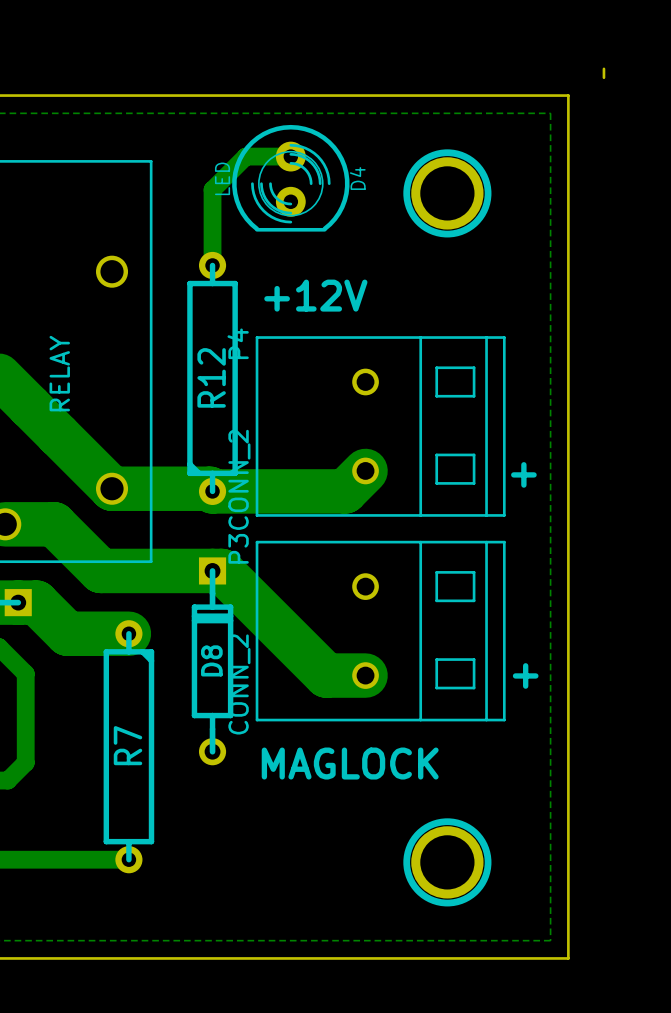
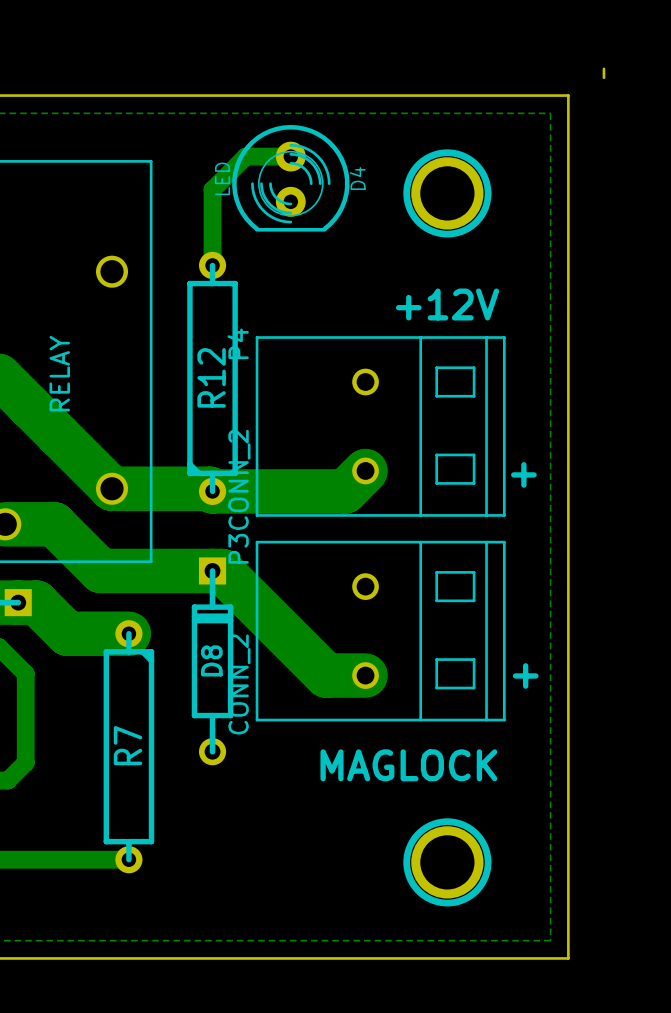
text position: +12V (315, 295) -> +12V (447, 304)
text position: MAGLOCK (350, 763) -> MAGLOCK (408, 765)

